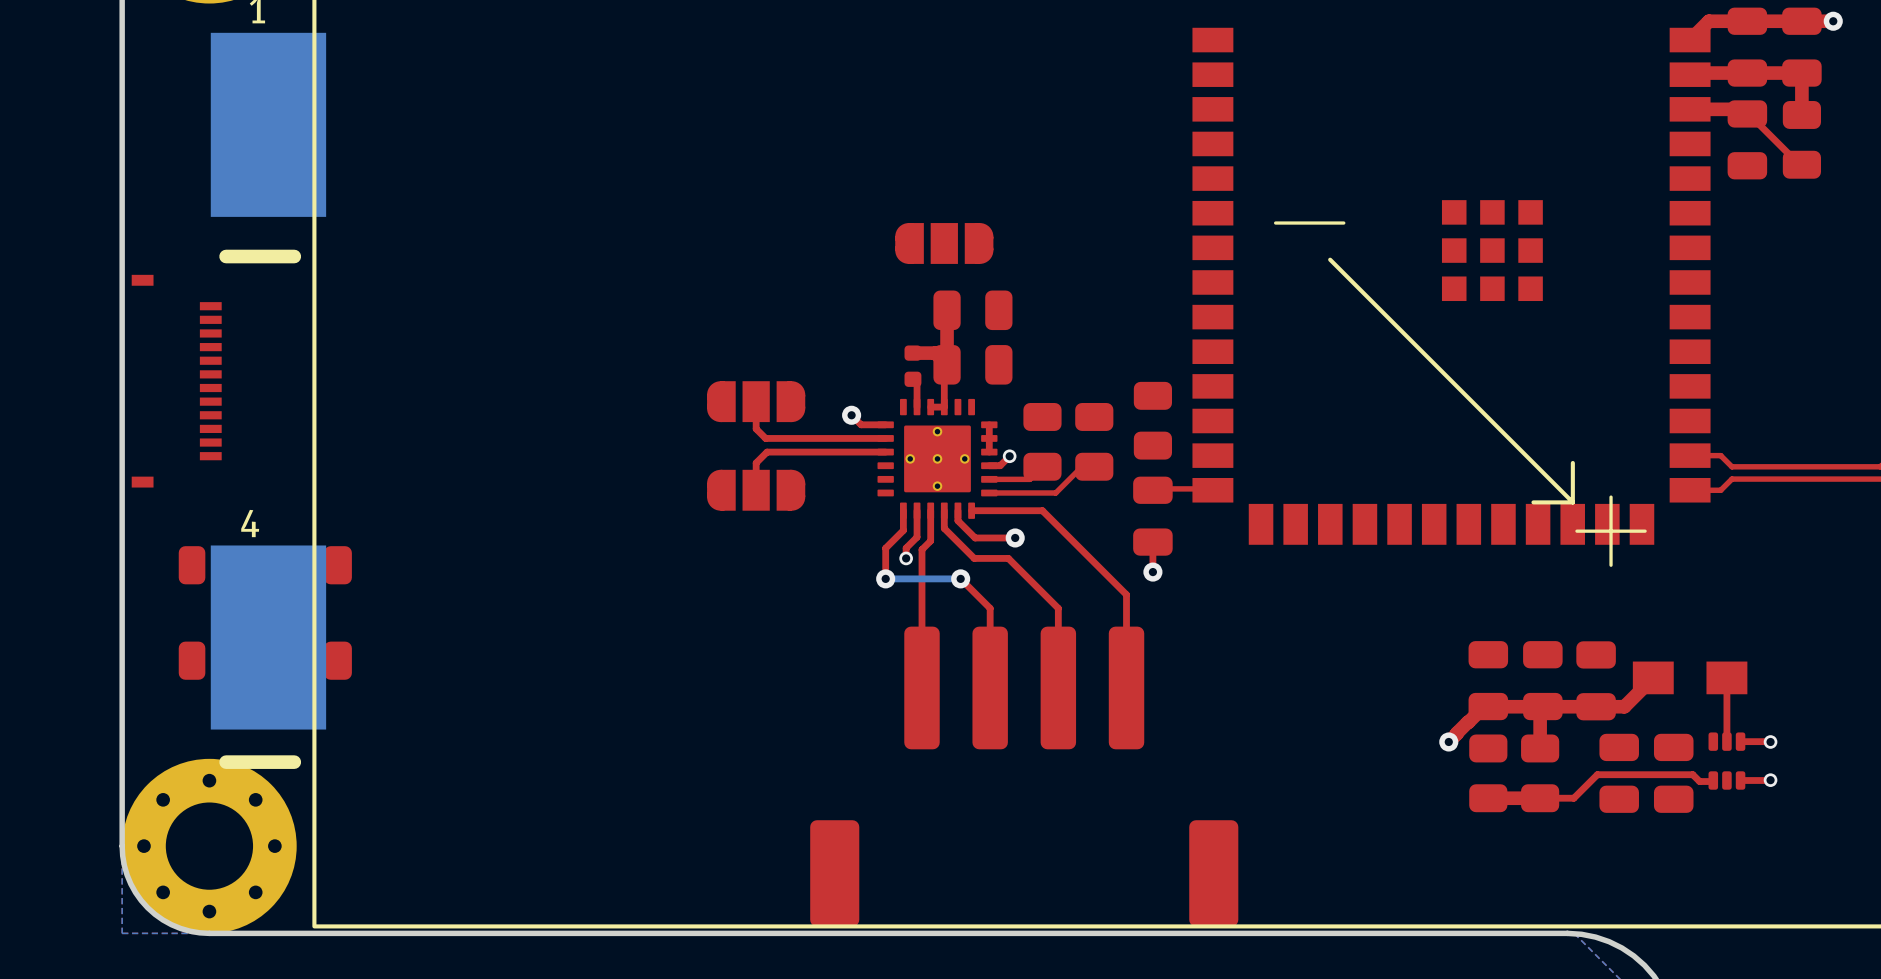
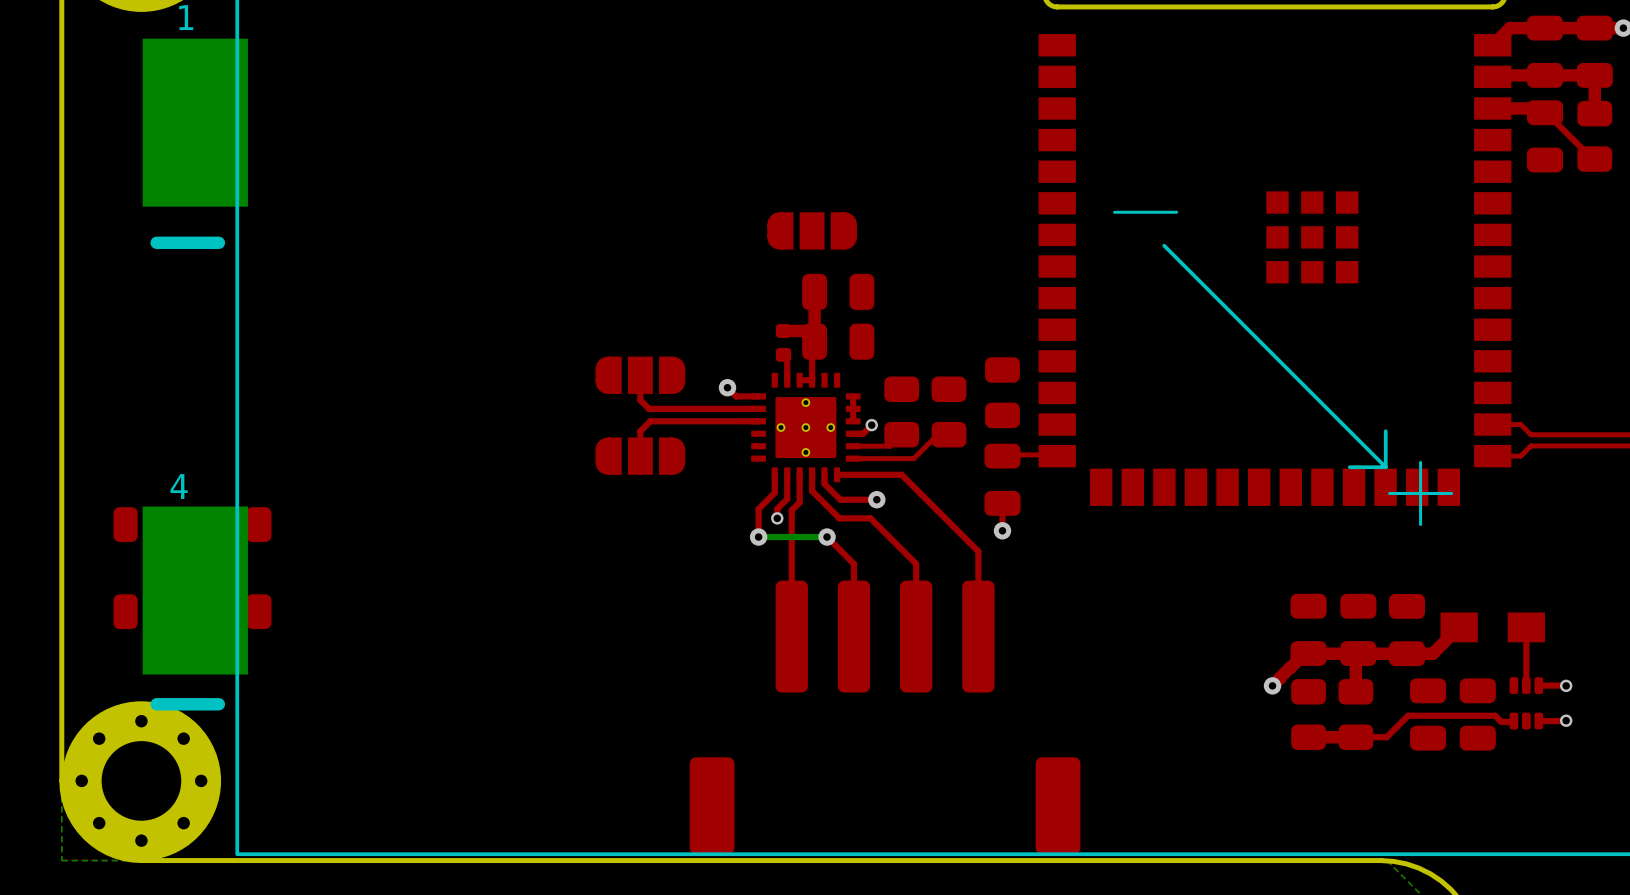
part: (176, 381) -> none

